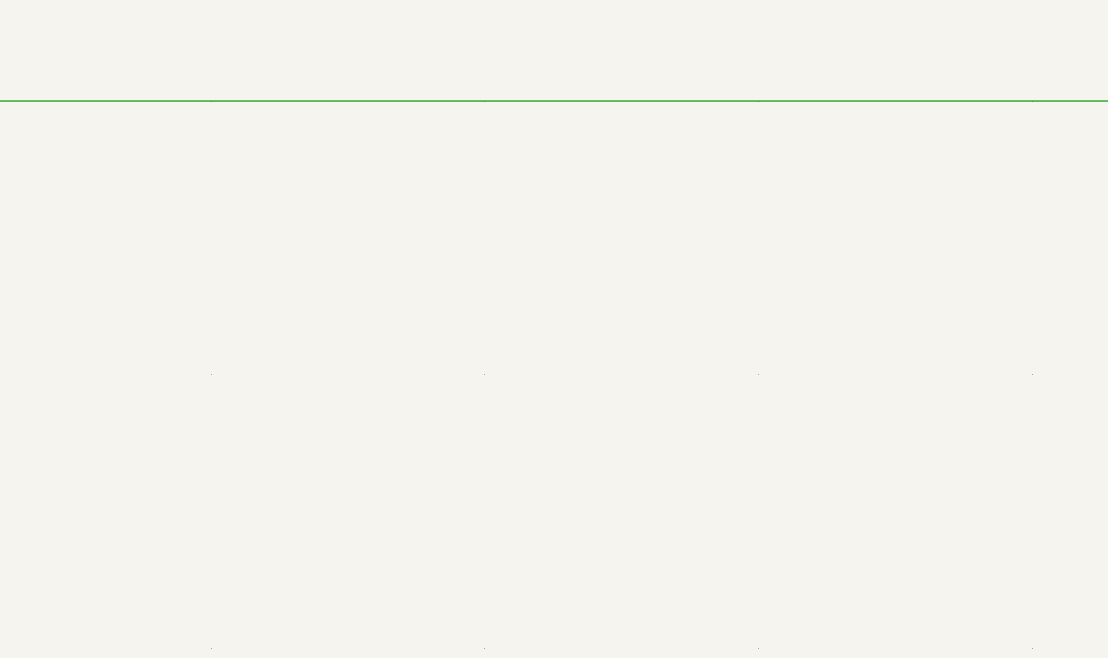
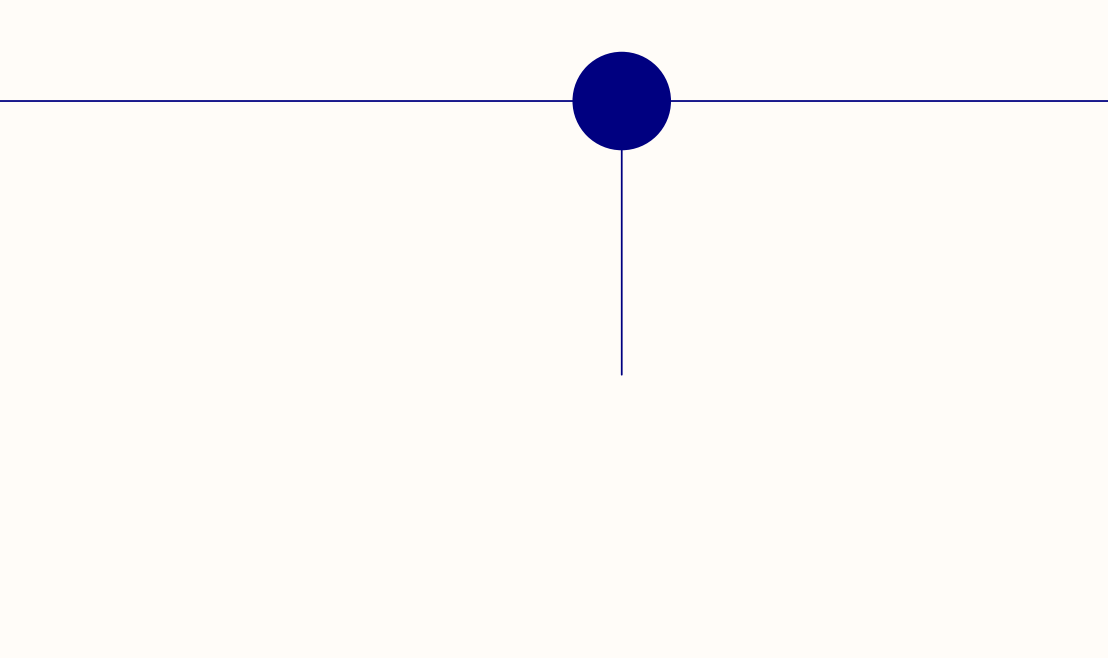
wire: none -> (621, 101) (621, 374)
junction: none -> (621, 101)

